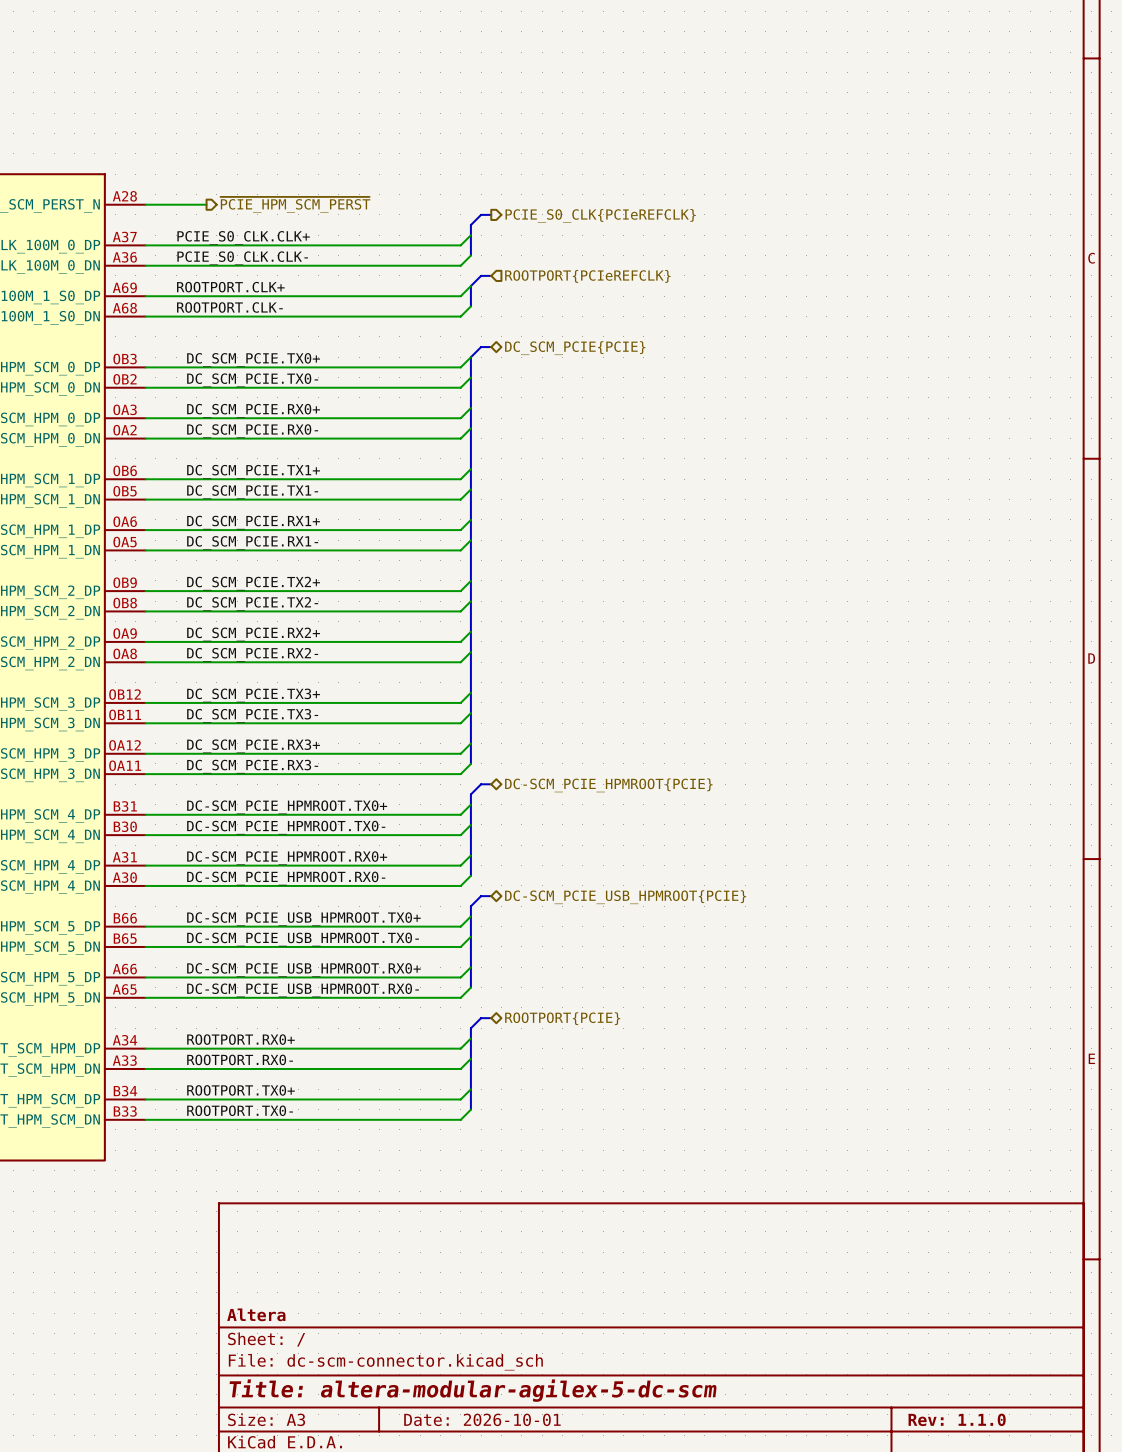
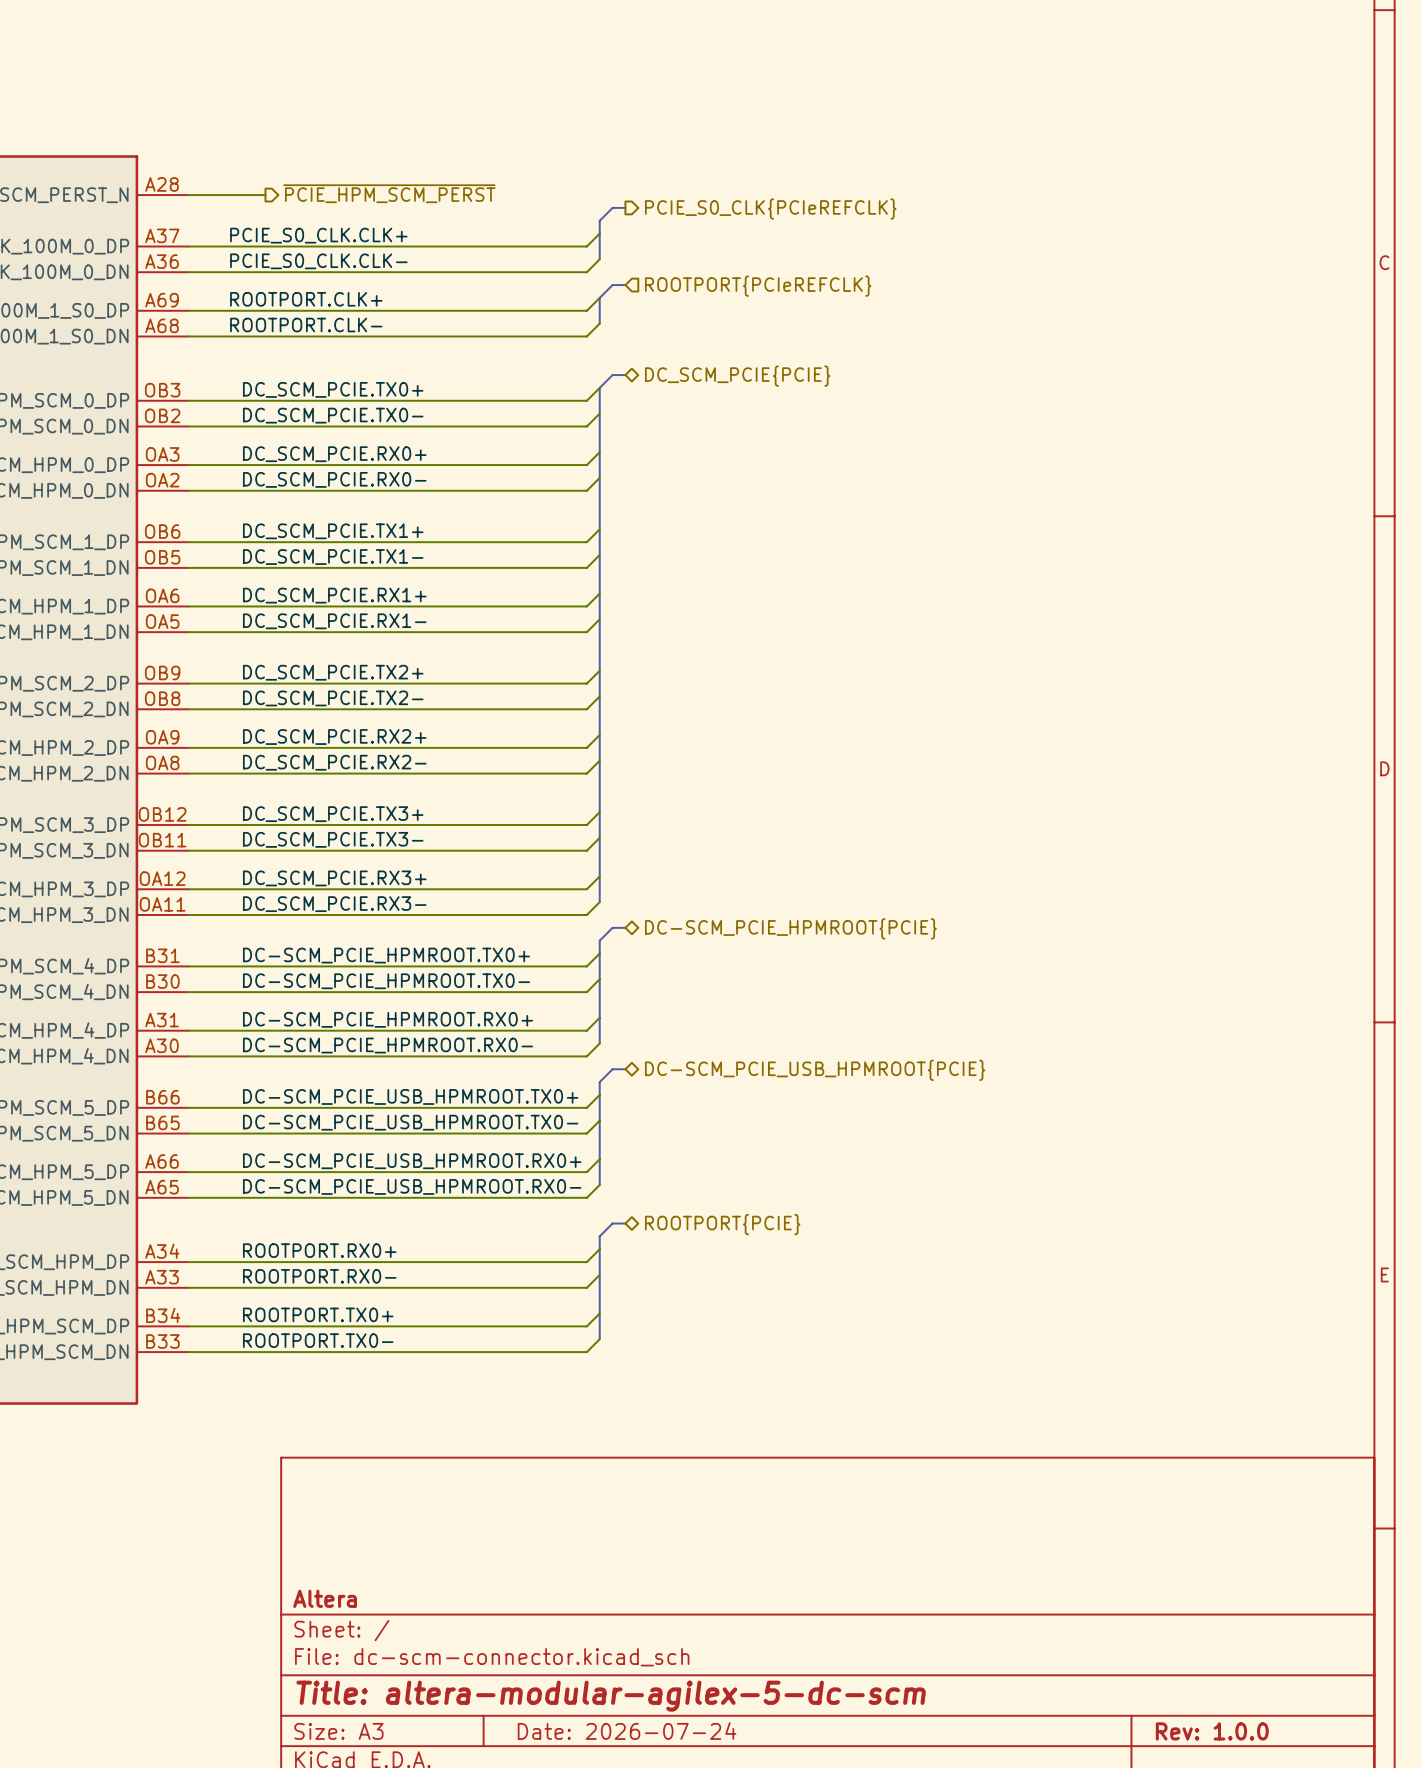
title block: Date: 2026-10-01 (482, 1419) -> Date: 2026-07-24 (627, 1731)
title block: Rev: 1.1.0 (957, 1419) -> Rev: 1.0.0 (1212, 1731)

